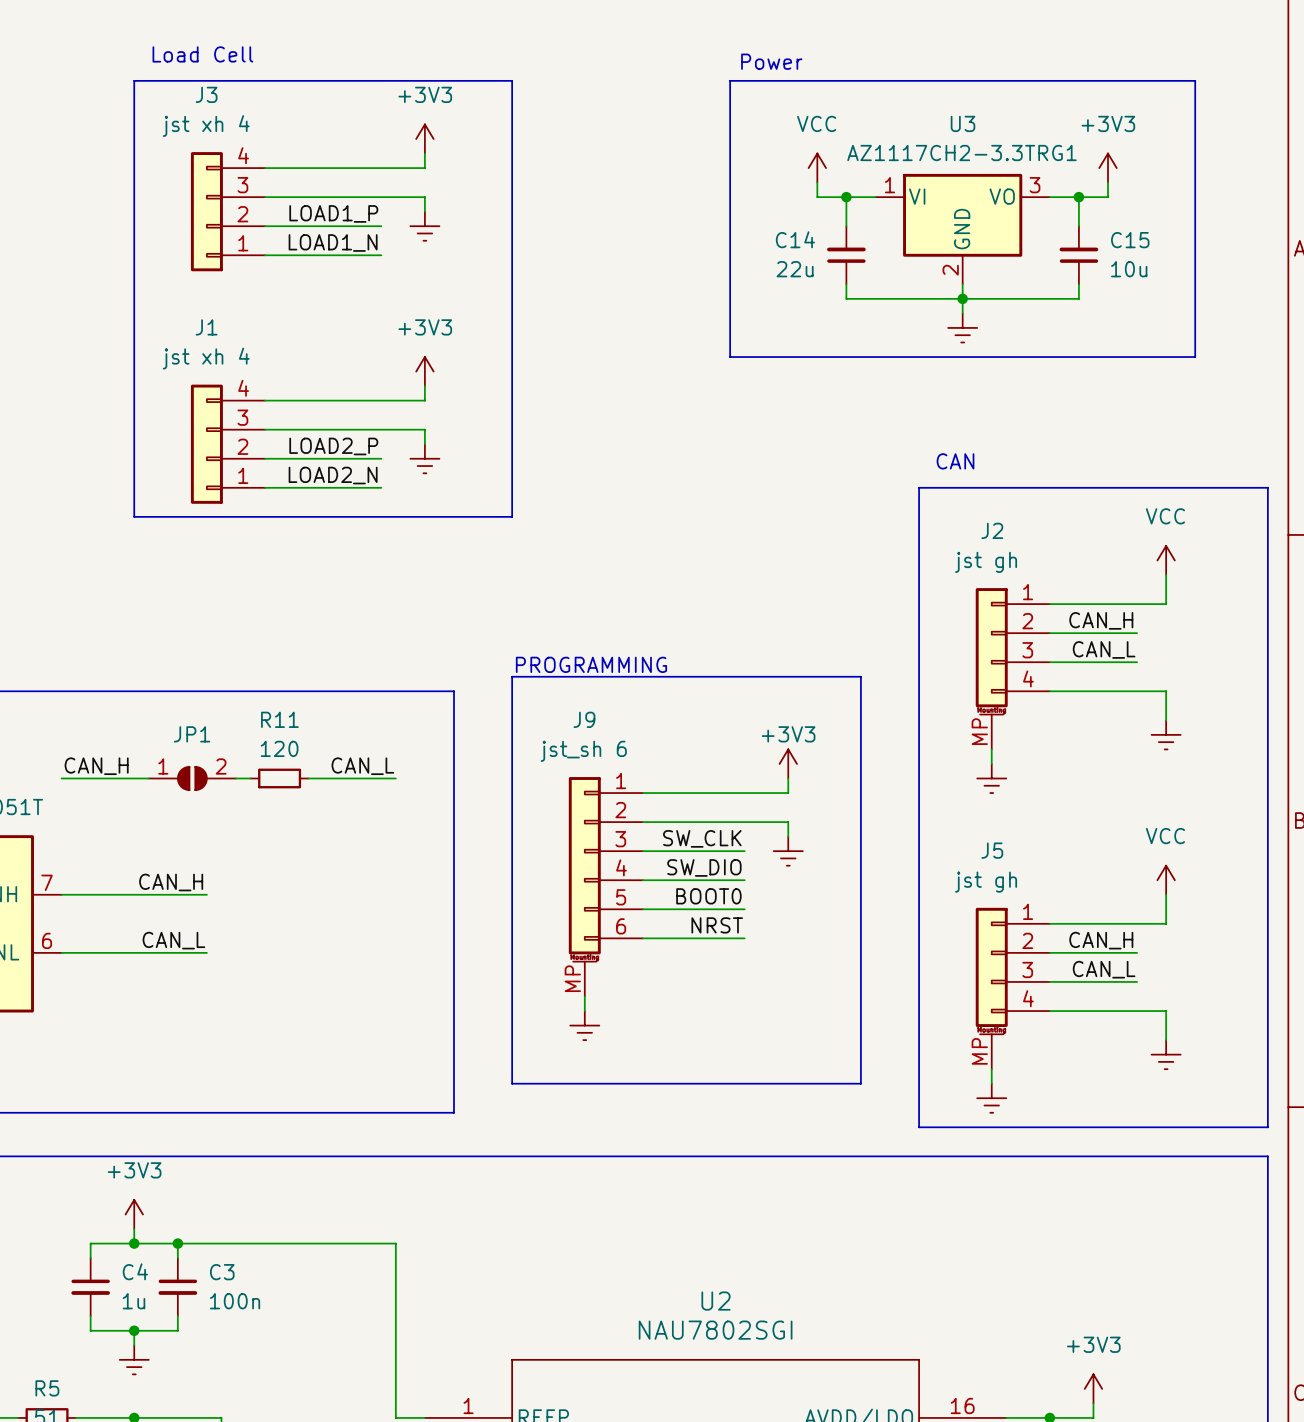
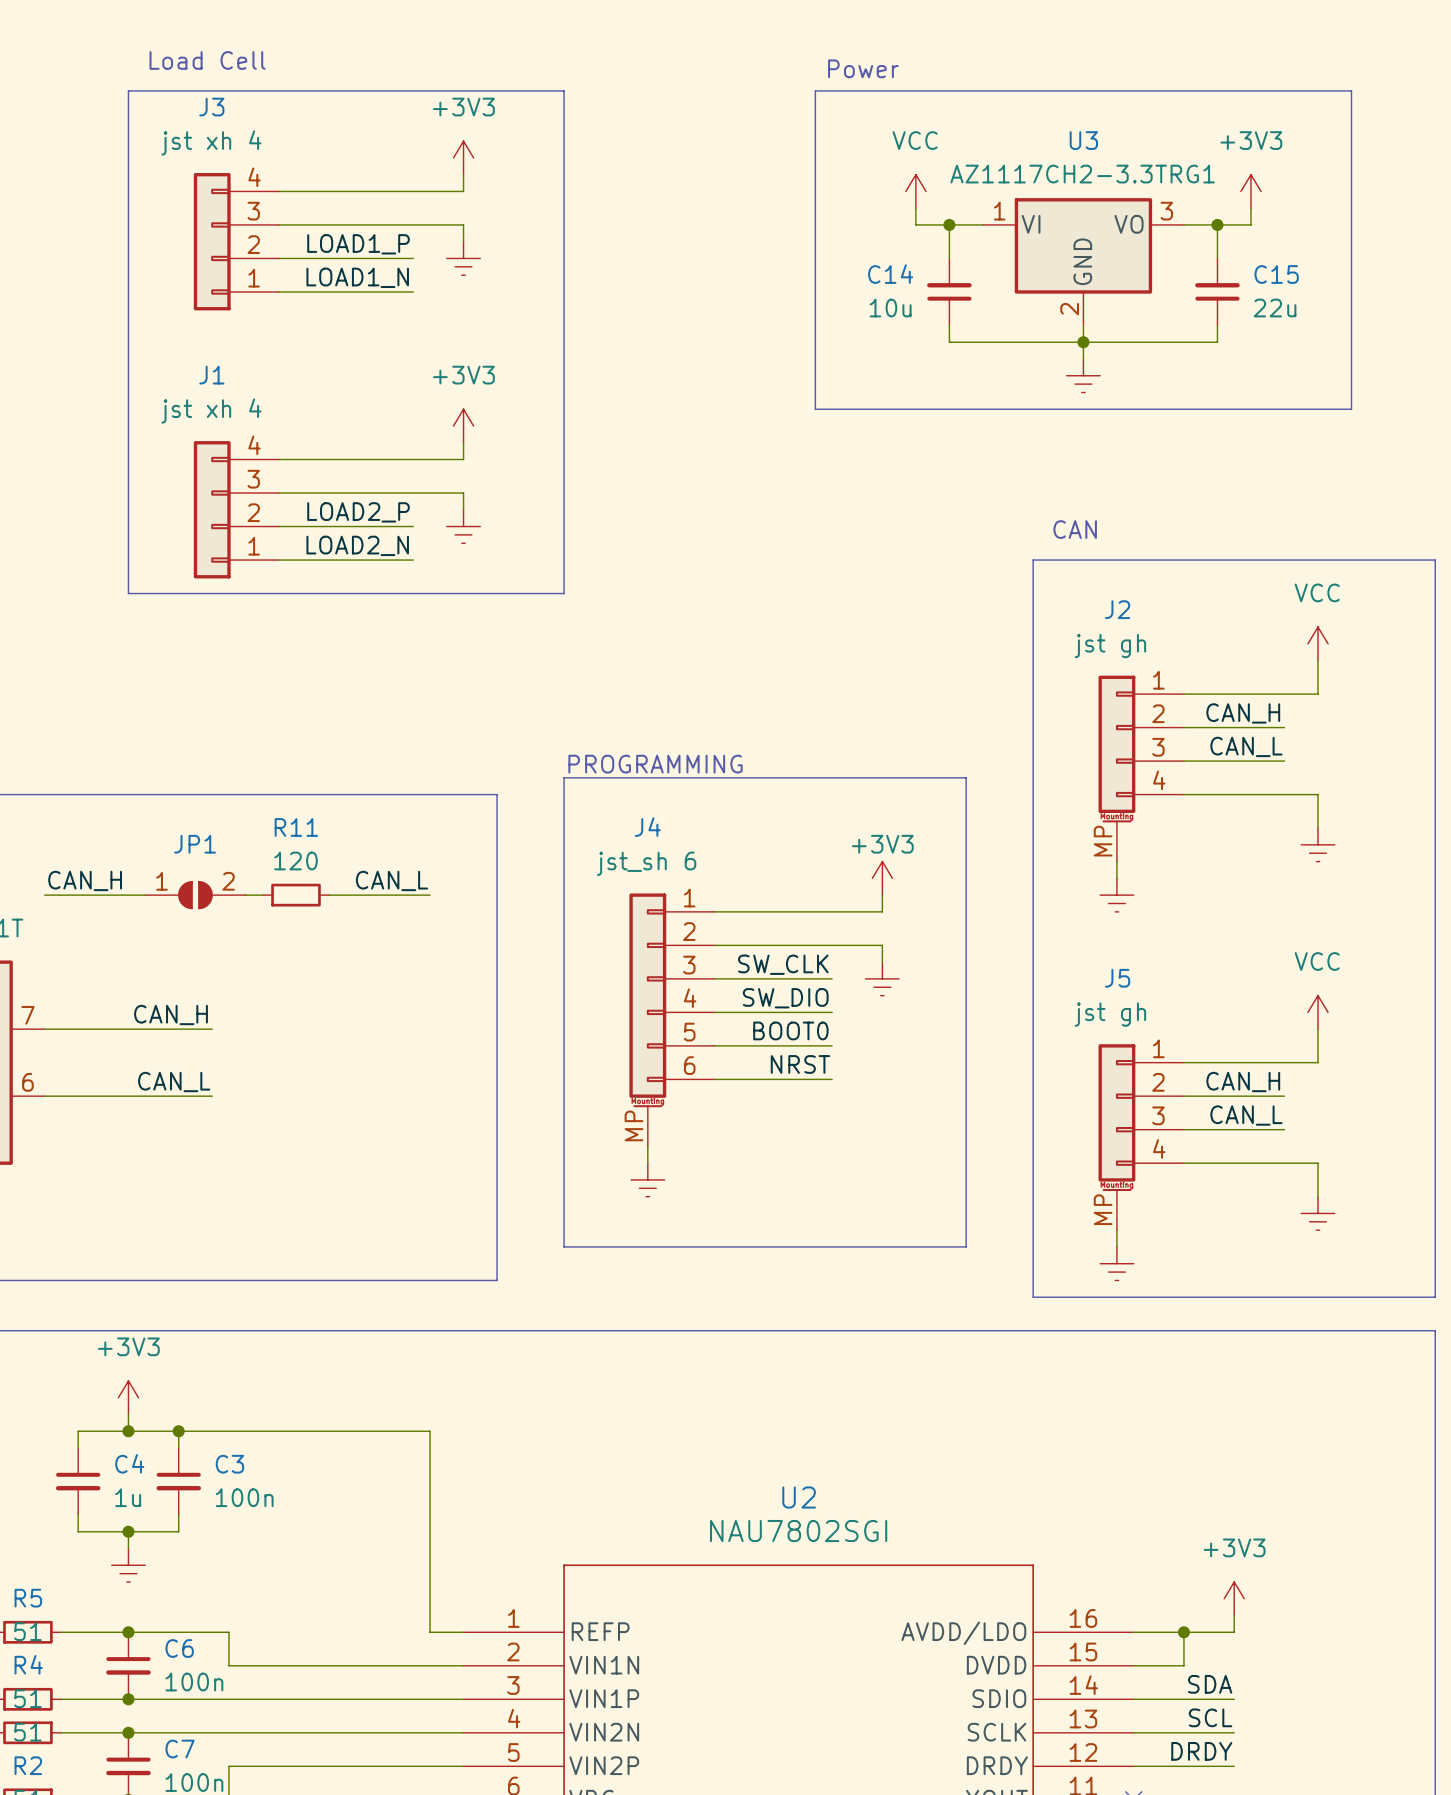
C14 value: 22u (795, 269) -> 10u (890, 308)
C15 value: 10u (1129, 269) -> 22u (1275, 308)
J9 name: J9 (584, 719) -> J4 (647, 827)

